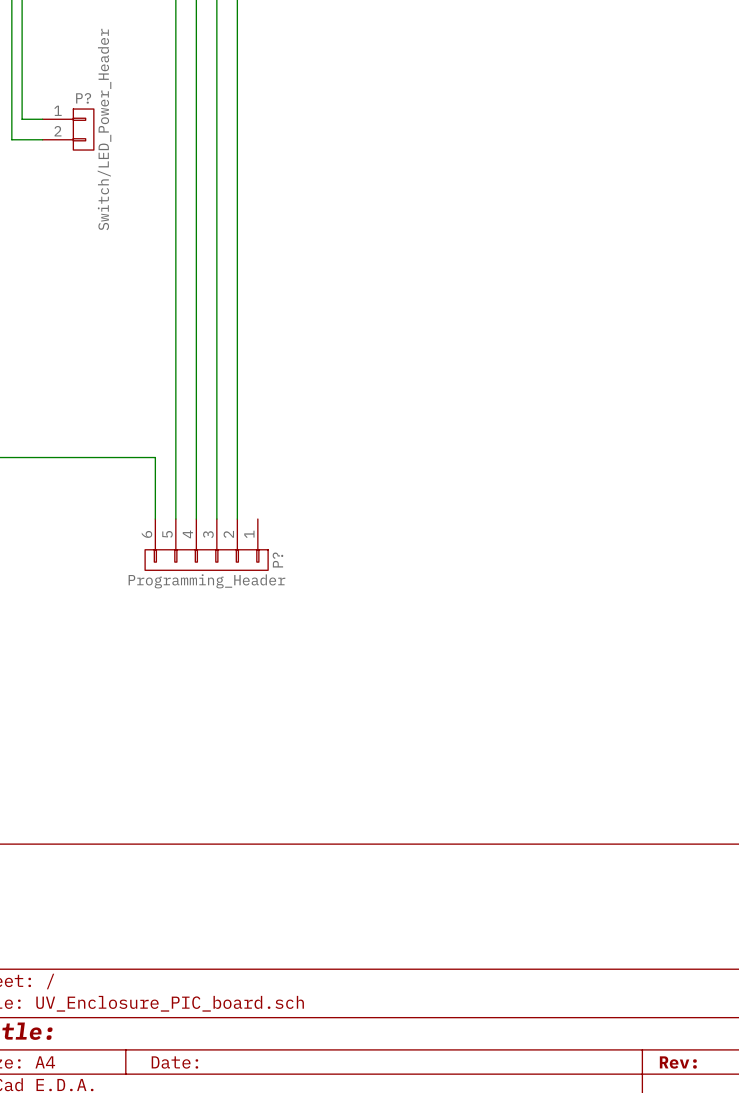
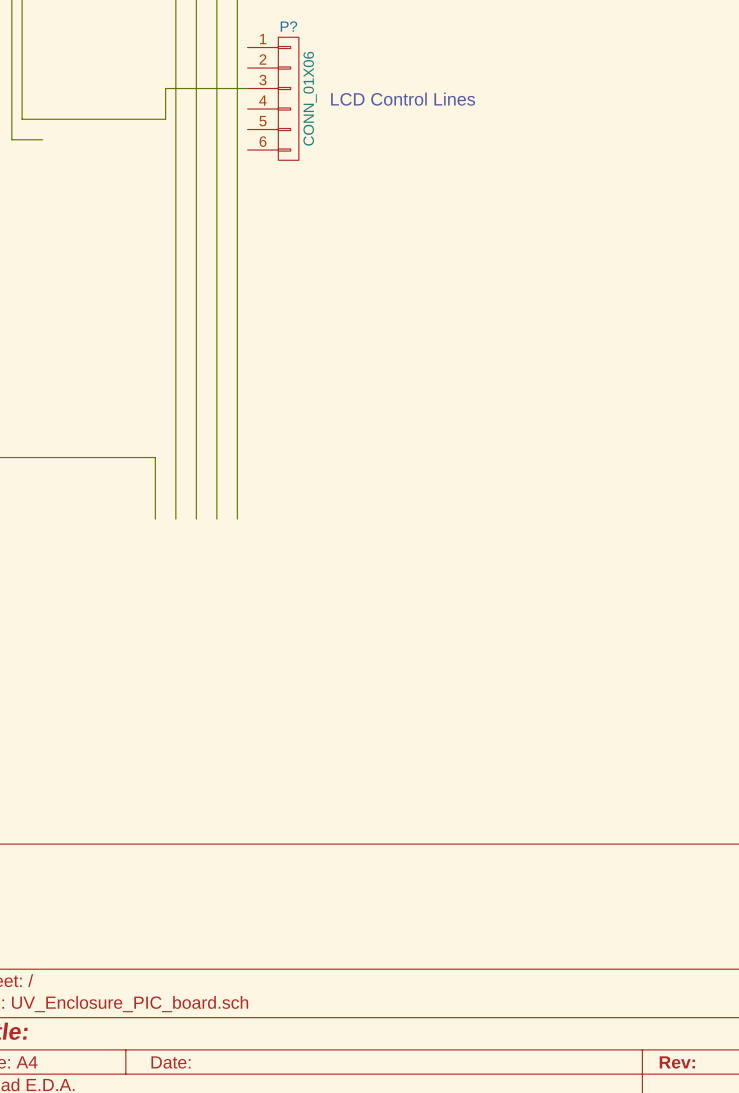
wire: none -> (247, 88) (165, 88) (165, 119) (42, 119)
P?: none -> CONN_01X06 (273, 98)
text: none -> LCD Control Lines (403, 99)
P?: Switch/LED_Power_Header (68, 129) -> none
P?: Programming_Header (206, 544) -> none

